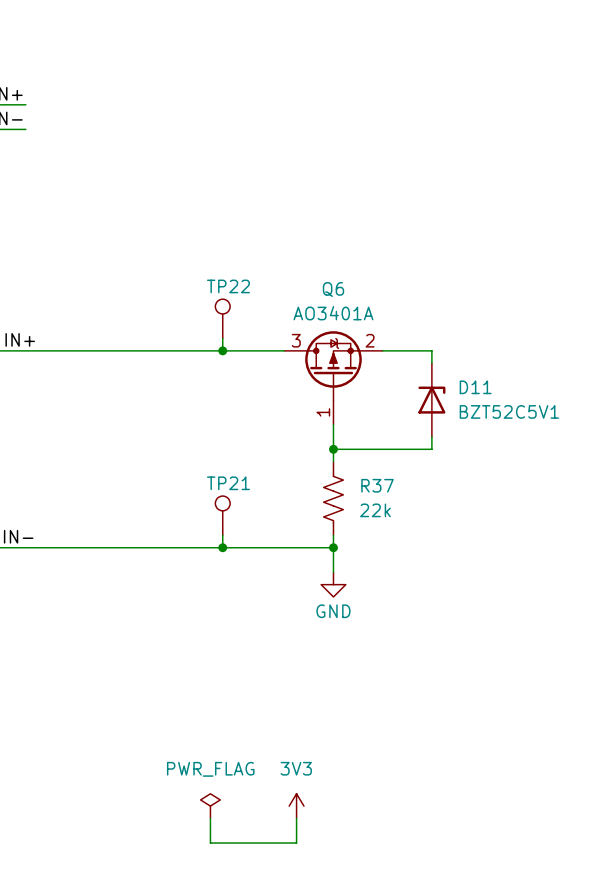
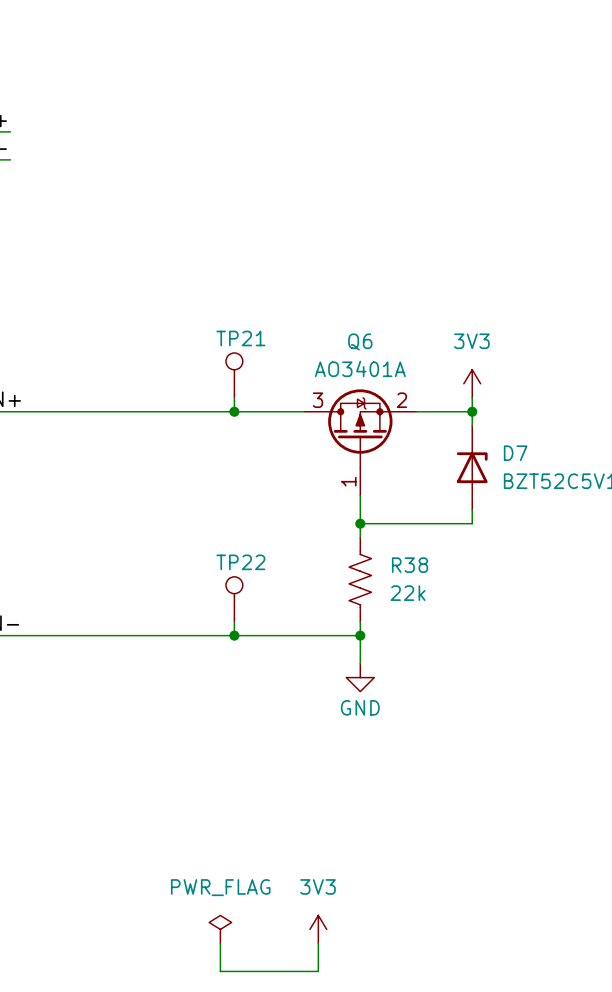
TP22 name: TP22 (228, 286) -> TP21 (240, 338)
power symbol: none -> 3V3 (472, 383)
wire: none -> (472, 397) (472, 411)
junction: none -> (472, 411)
D11 name: D11 (475, 387) -> D7 (515, 453)
TP21 name: TP21 (228, 483) -> TP22 (240, 562)
R37 name: R37 (377, 485) -> R38 (410, 565)

